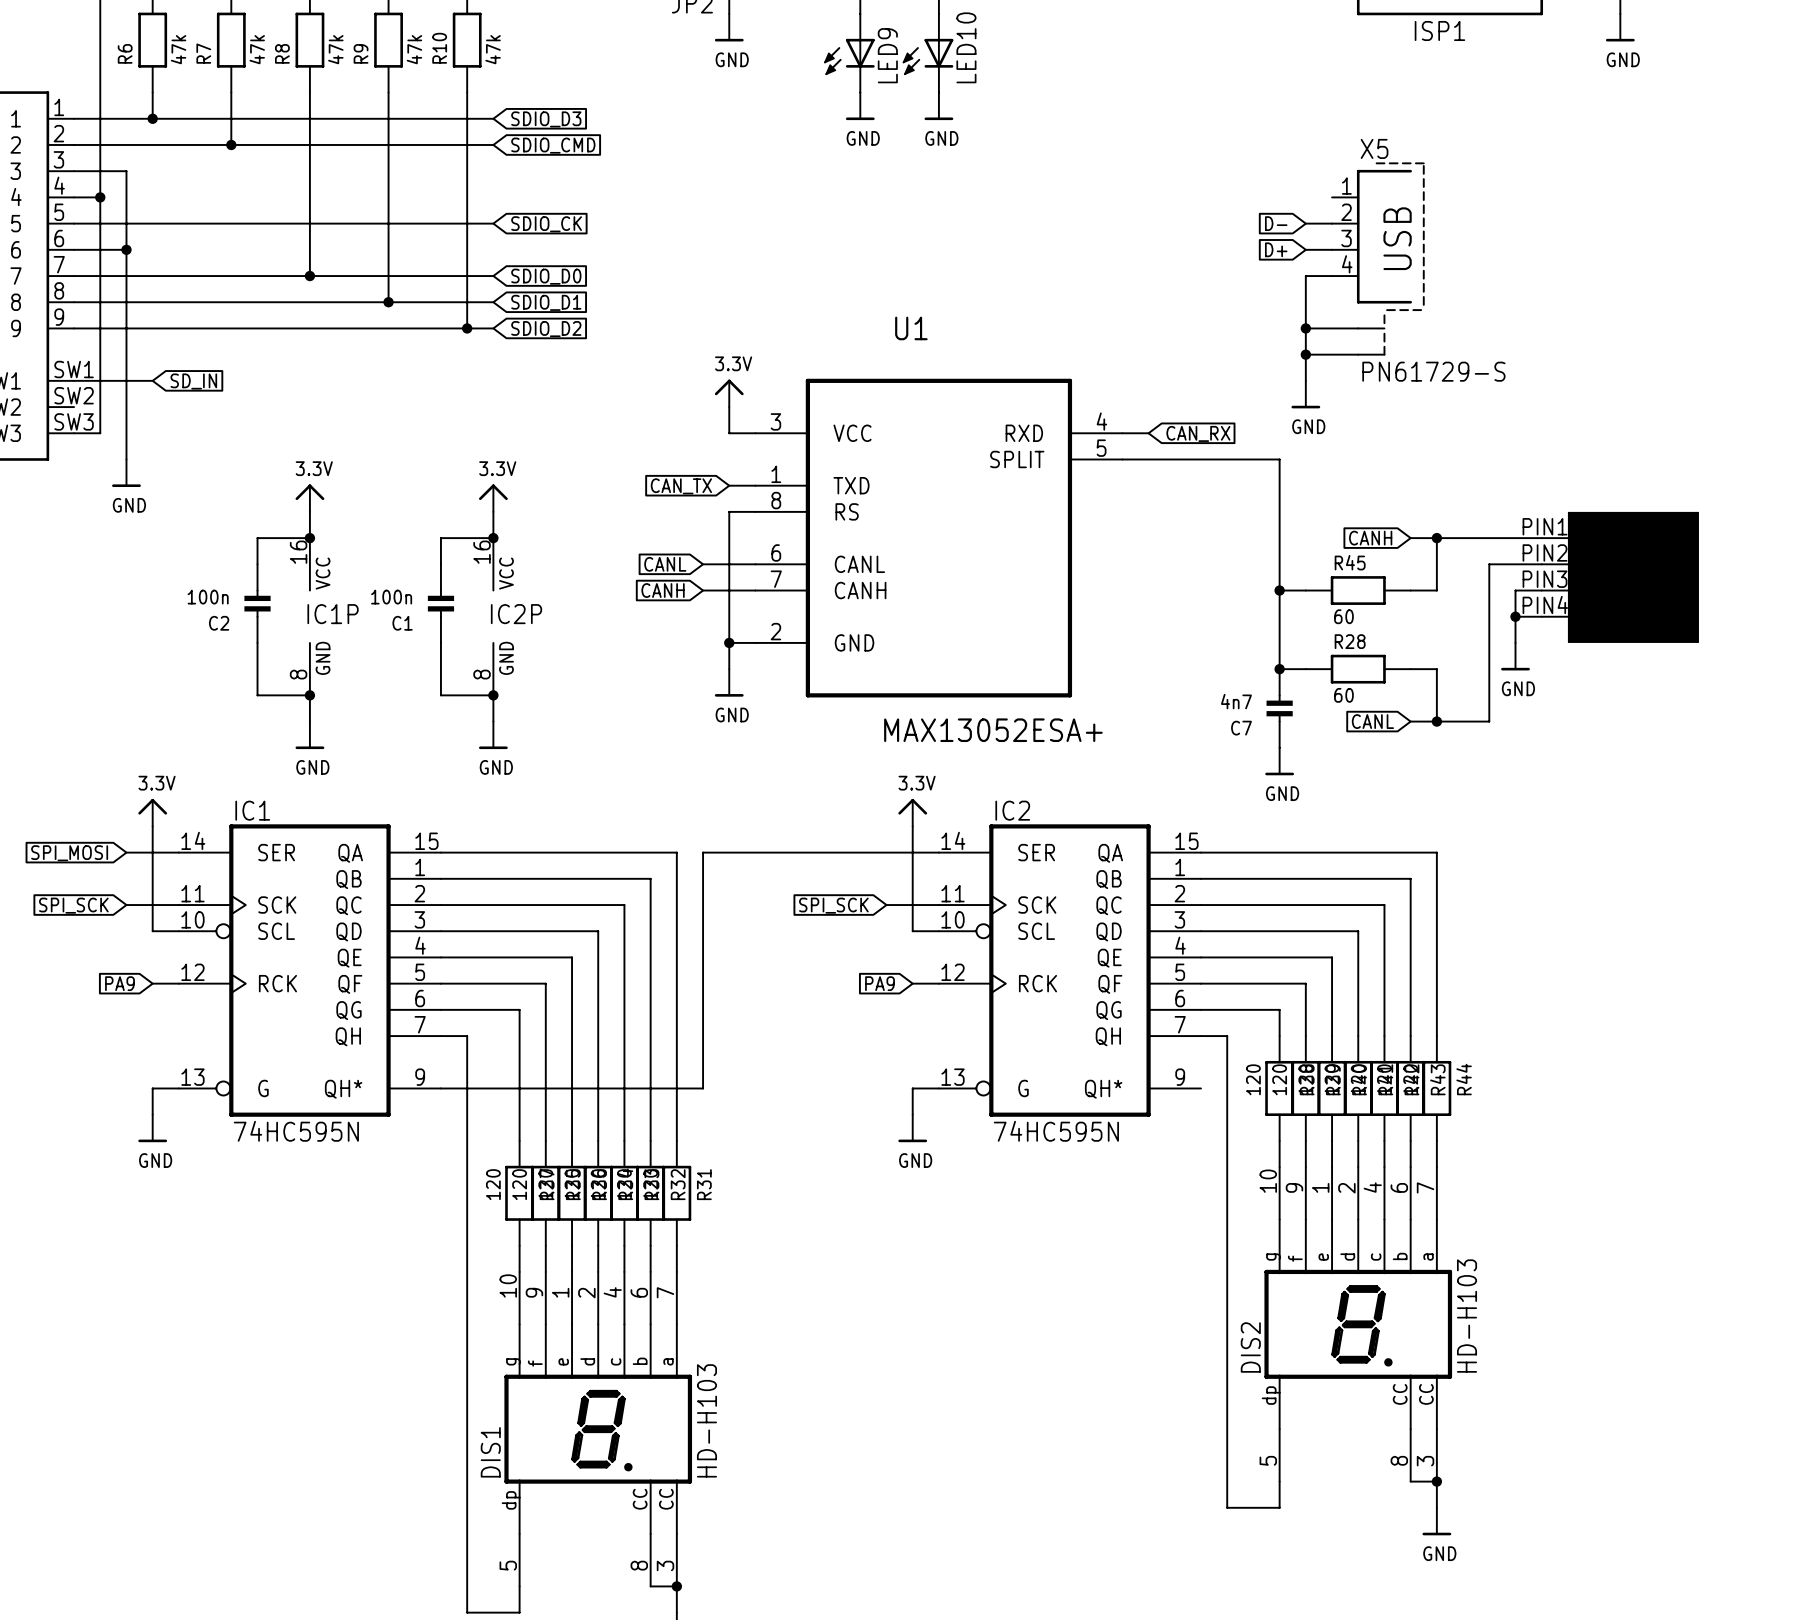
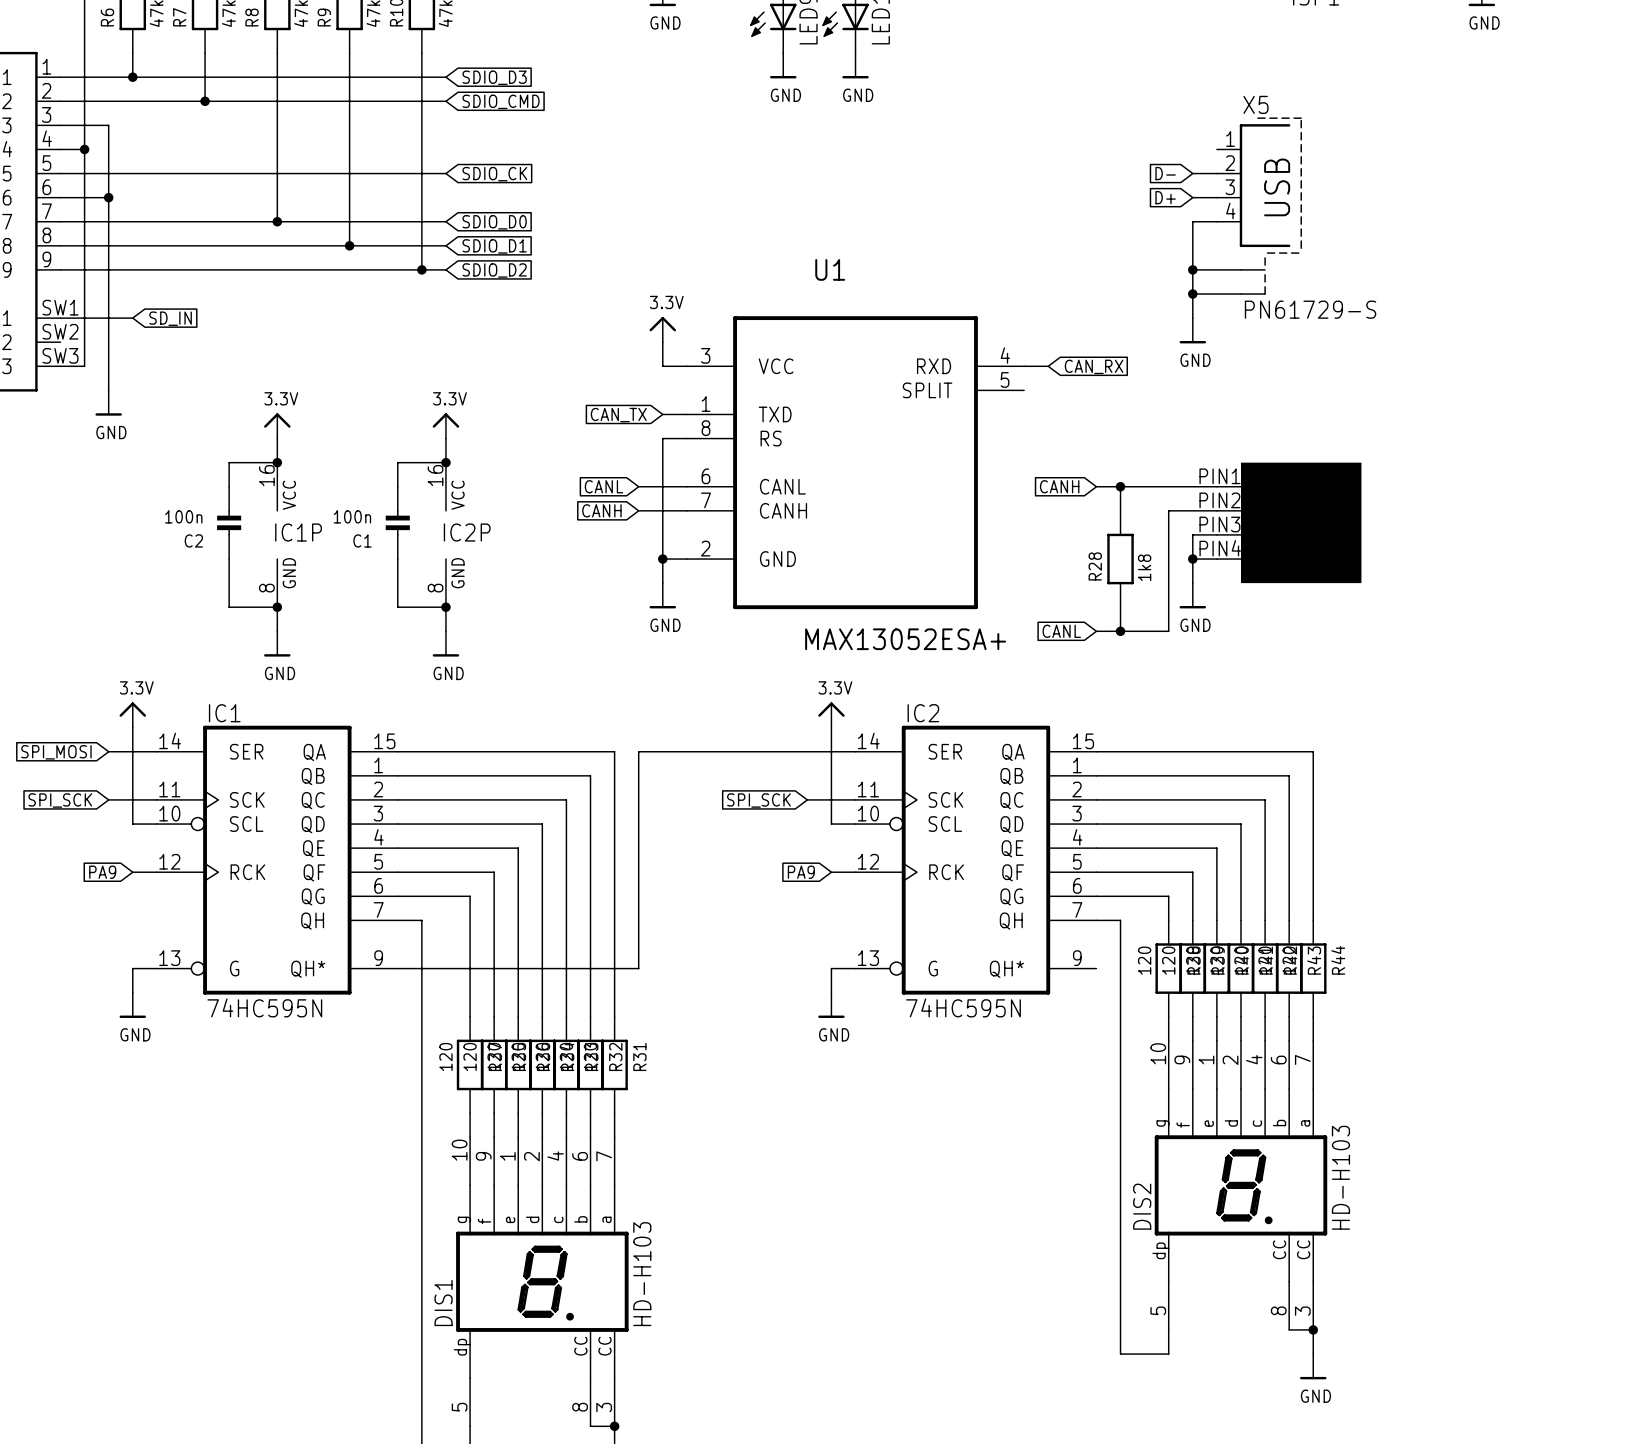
wire: (1122, 459) (1279, 459) (1279, 590) -> none
global label position: CANH (1370, 538) -> CANH (1059, 486)
wire: (1410, 538) (1541, 538) -> (1096, 486) (1216, 486)
junction: (1436, 538) -> none
wire: none -> (1120, 486) (1120, 510)
junction: none -> (1120, 486)
wire: (1541, 564) (1489, 564) (1489, 721) (1410, 721) -> none
part position: (1620, 577) -> (1289, 522)
junction: (1279, 590) -> none
R45: 60 (1358, 590) -> none
wire: (1541, 590) (1515, 590) (1515, 642) -> none
wire: (1515, 616) (1541, 616) -> (1192, 559) (1216, 559)
junction: (1515, 616) -> none
R28 name position: R28 (1350, 641) -> R28 (1095, 566)
junction: none -> (1192, 559)
power symbol: GND (1515, 656) -> none
wire: (1279, 669) (1305, 669) -> (1216, 534) (1192, 534) (1192, 583)
wire: none -> (1168, 583) (1168, 631) (1096, 631)
junction: (1279, 669) -> none
R28 rotation: 0° (1358, 669) -> 90° clockwise (1120, 559)
R28 position: (1358, 669) -> (1120, 559)
wire: (1410, 669) (1436, 669) (1436, 721) -> none
wire: none -> (1120, 607) (1120, 631)
R28 value: 60 (1343, 695) -> 1k8 (1144, 567)
C7: 4n7 (1279, 708) -> none
junction: none -> (1120, 631)
global label position: CANL (1372, 721) -> CANL (1061, 631)
junction: (1436, 721) -> none
power symbol position: GND (1279, 761) -> GND (1192, 595)

